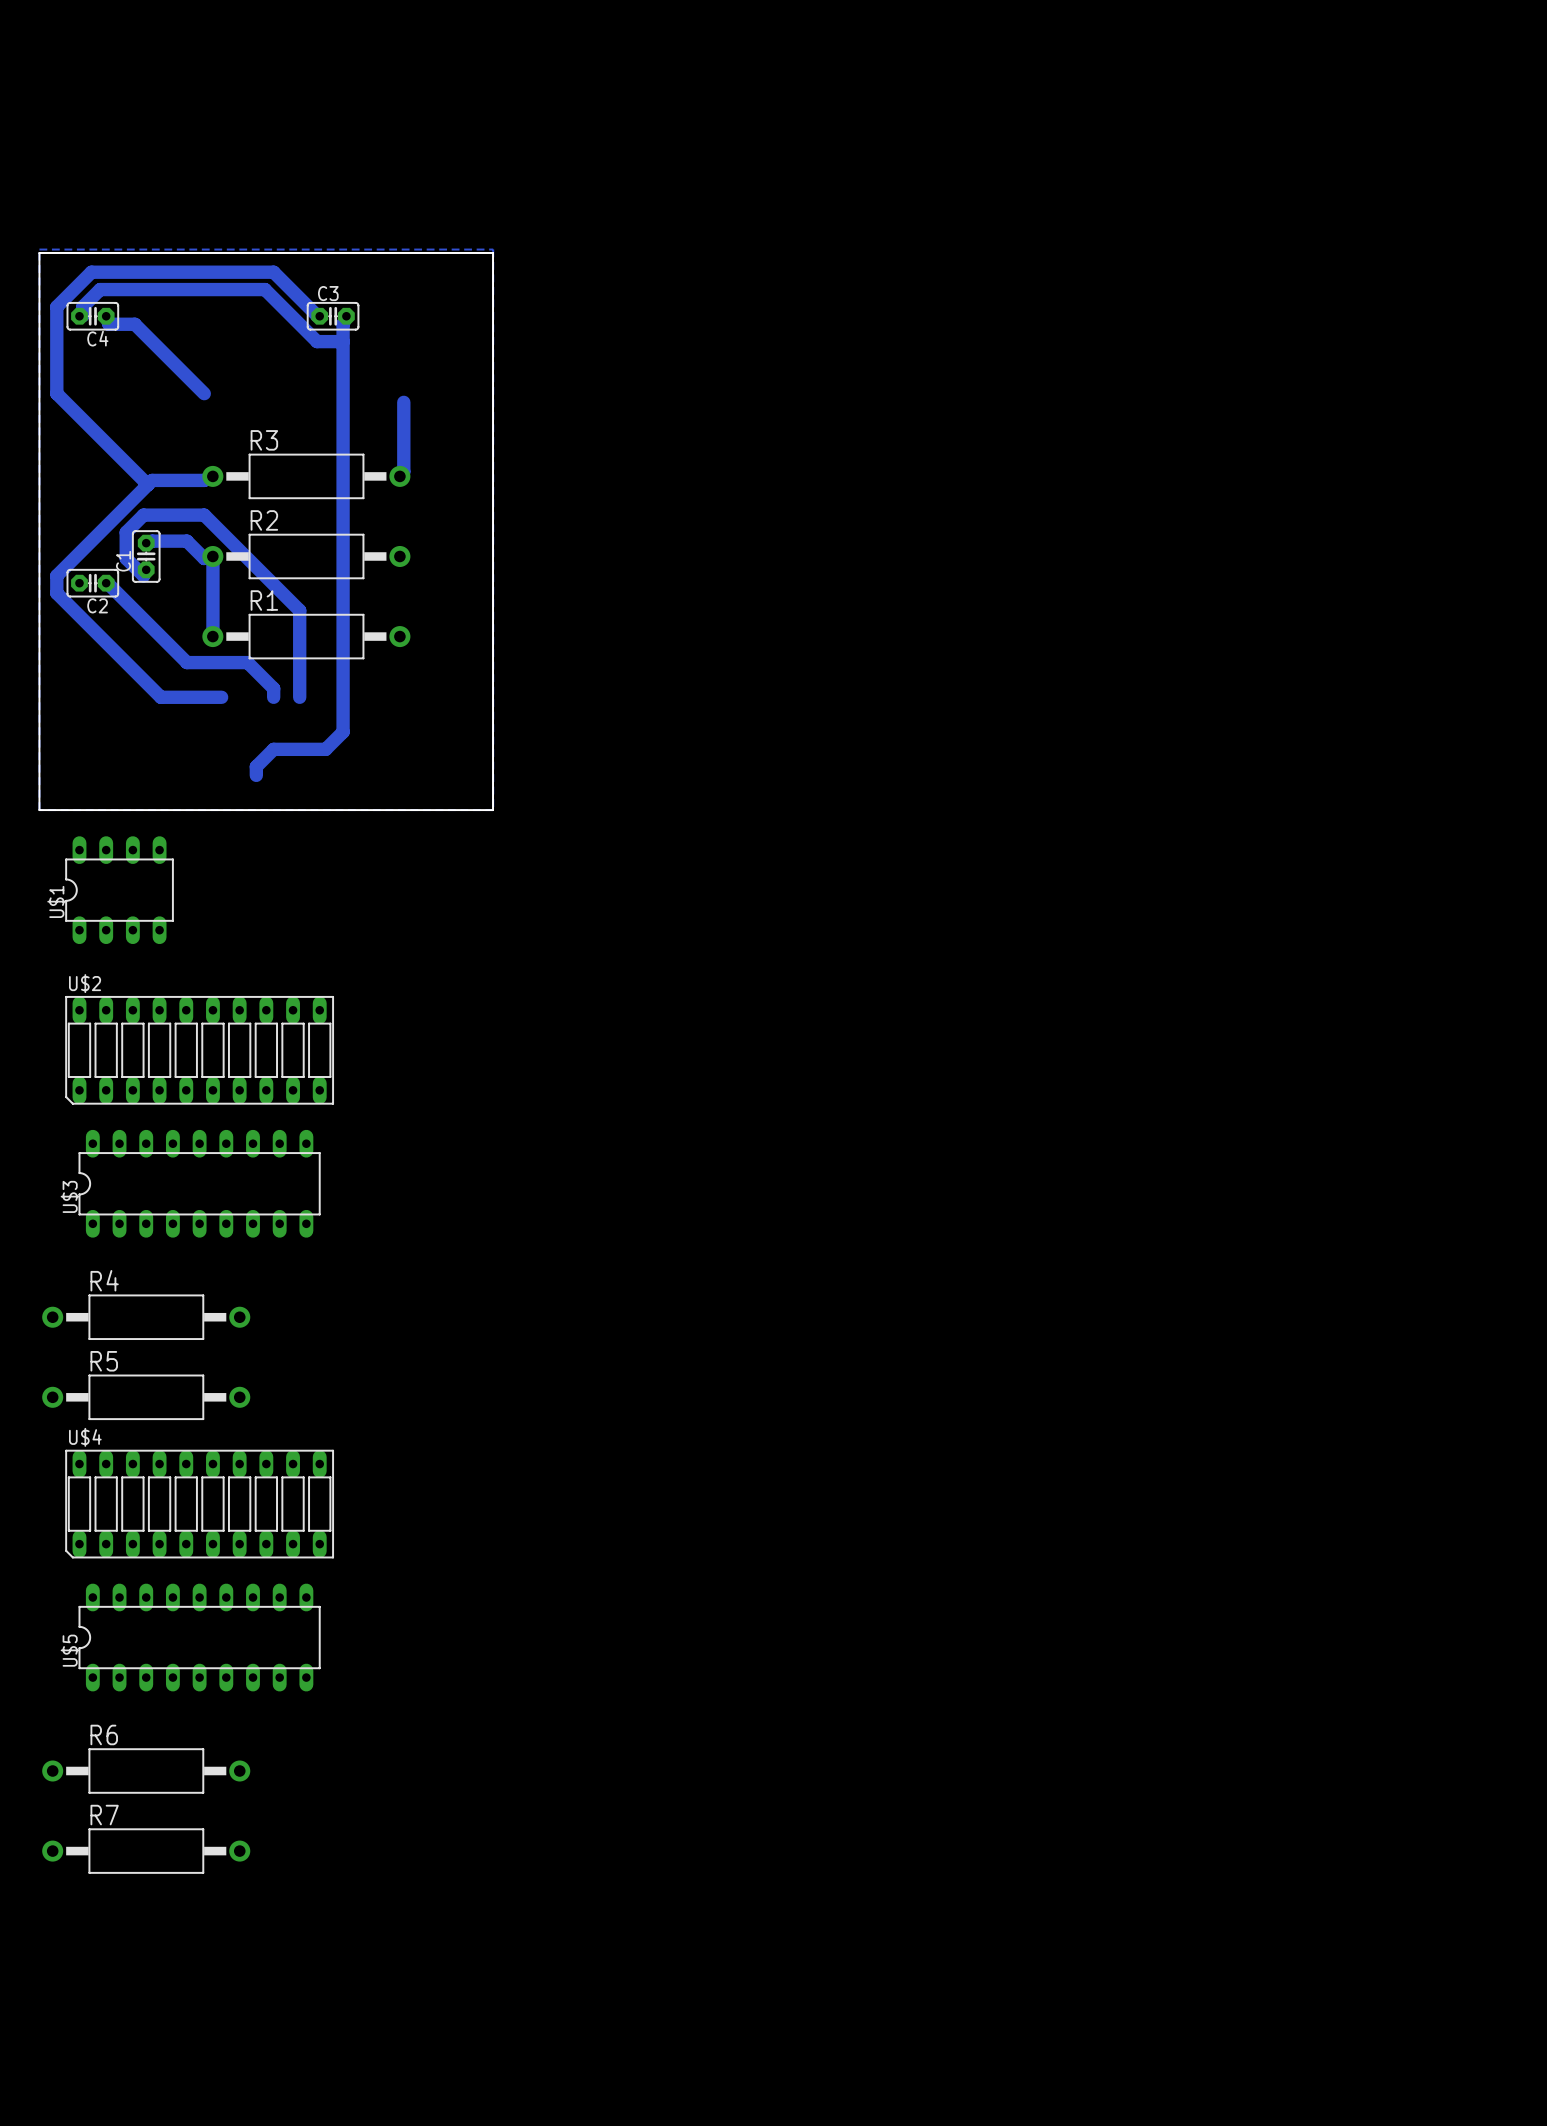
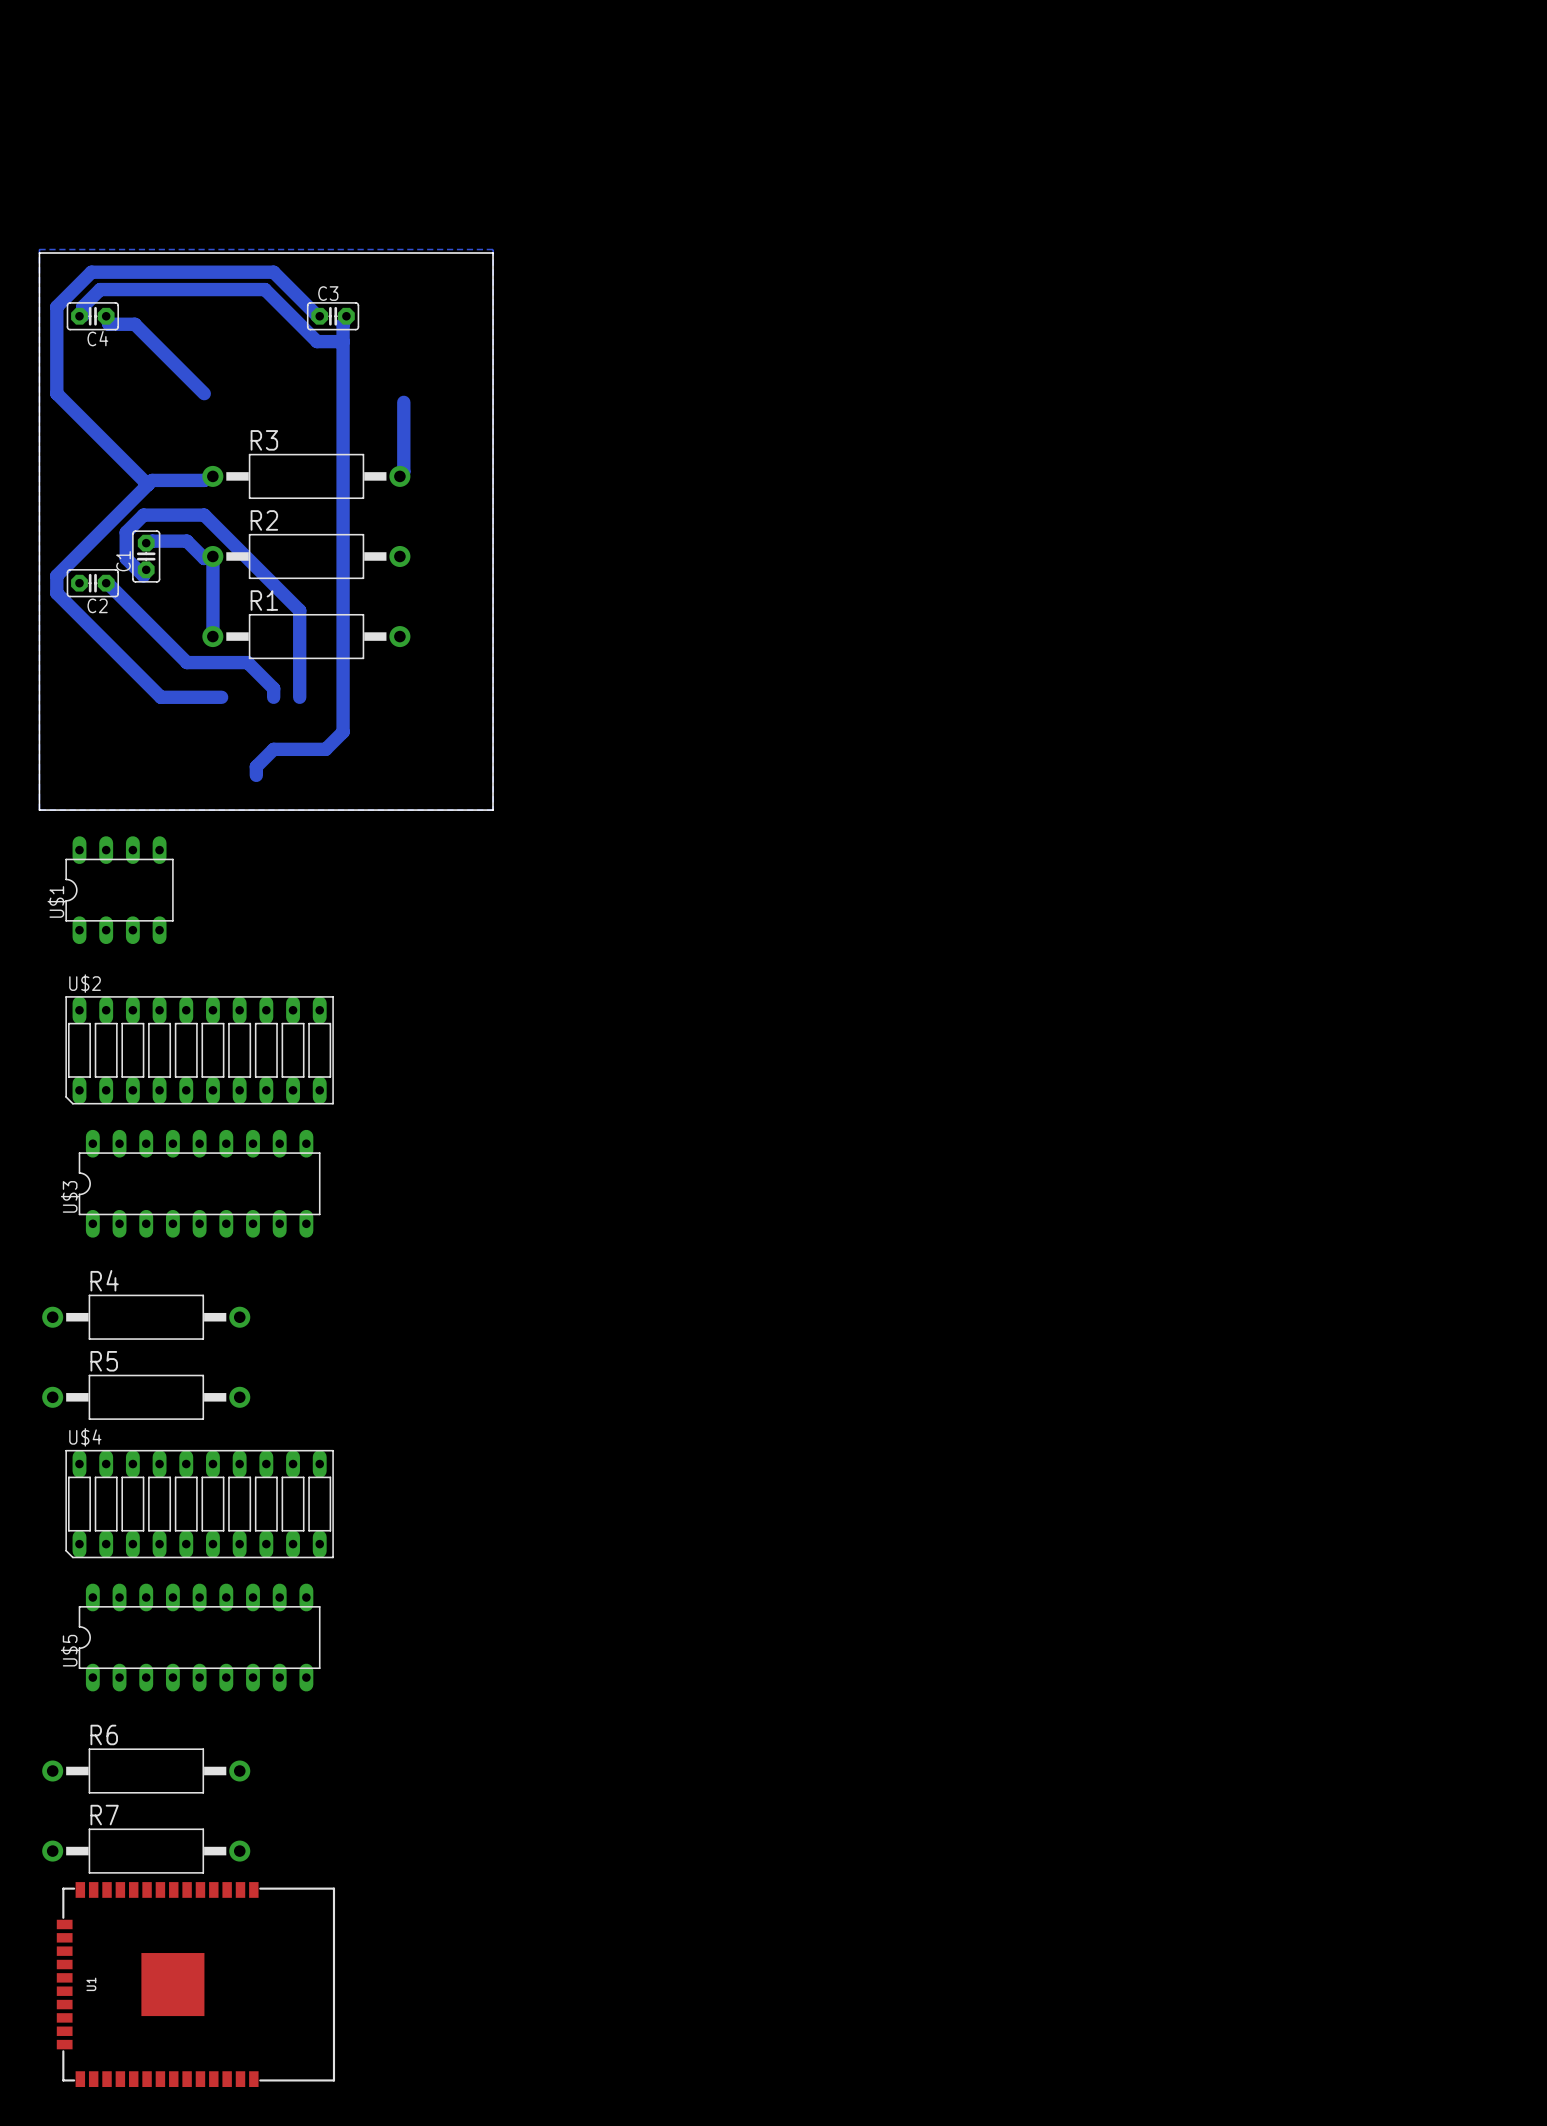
U1: none -> (195, 1984)

